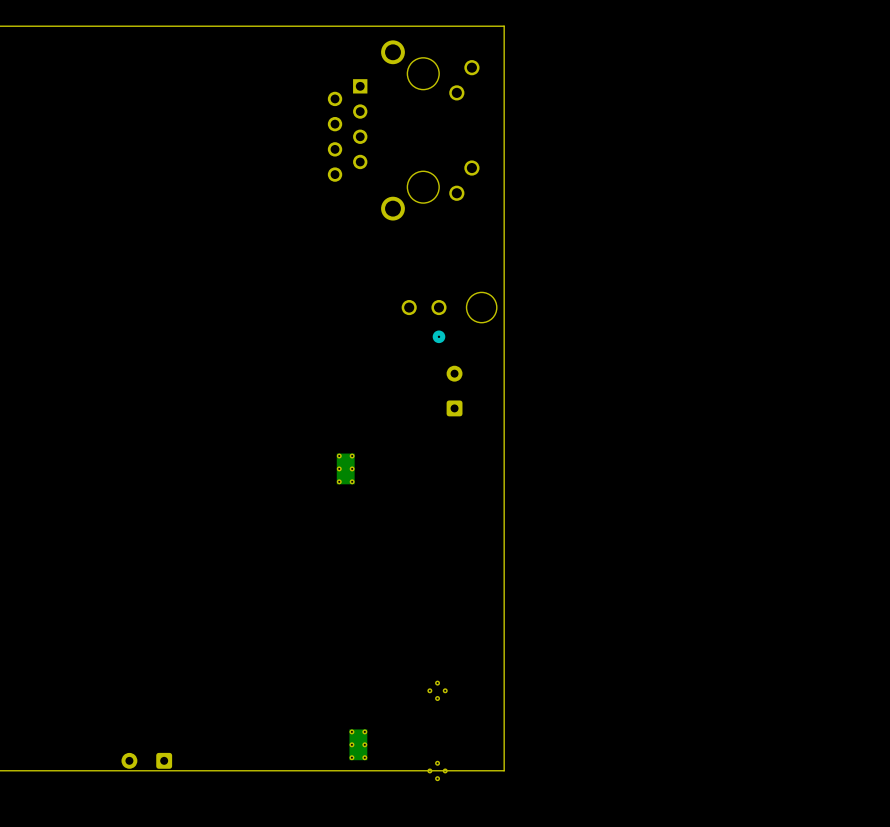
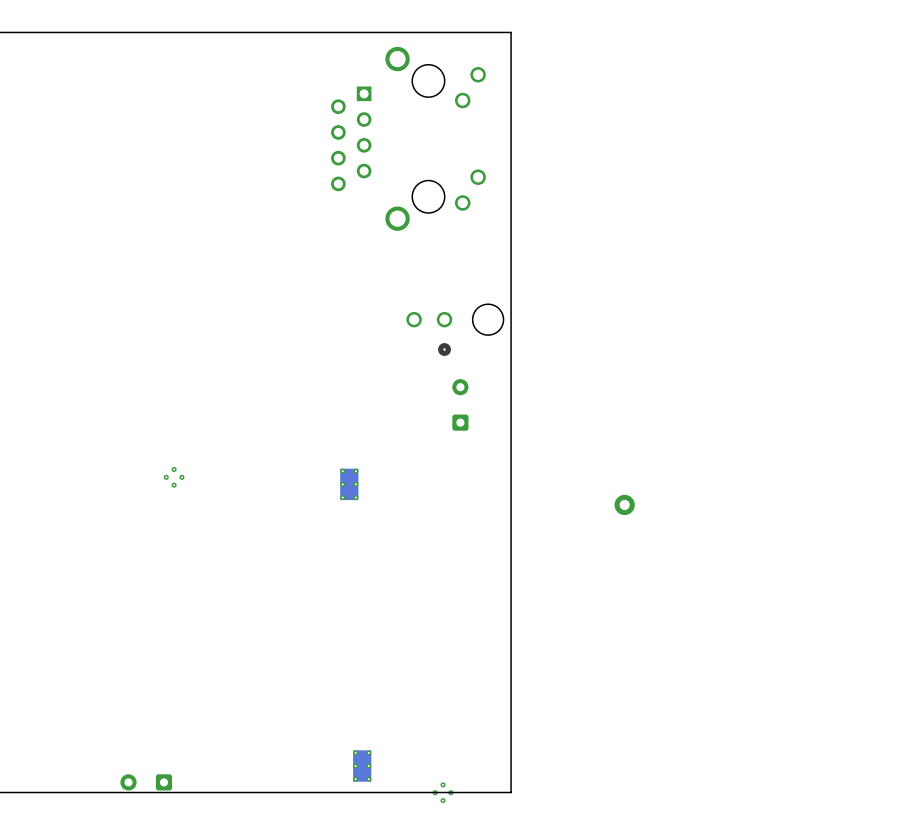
part: none -> (174, 477)
part: none -> (624, 504)
part: (437, 690) -> none

